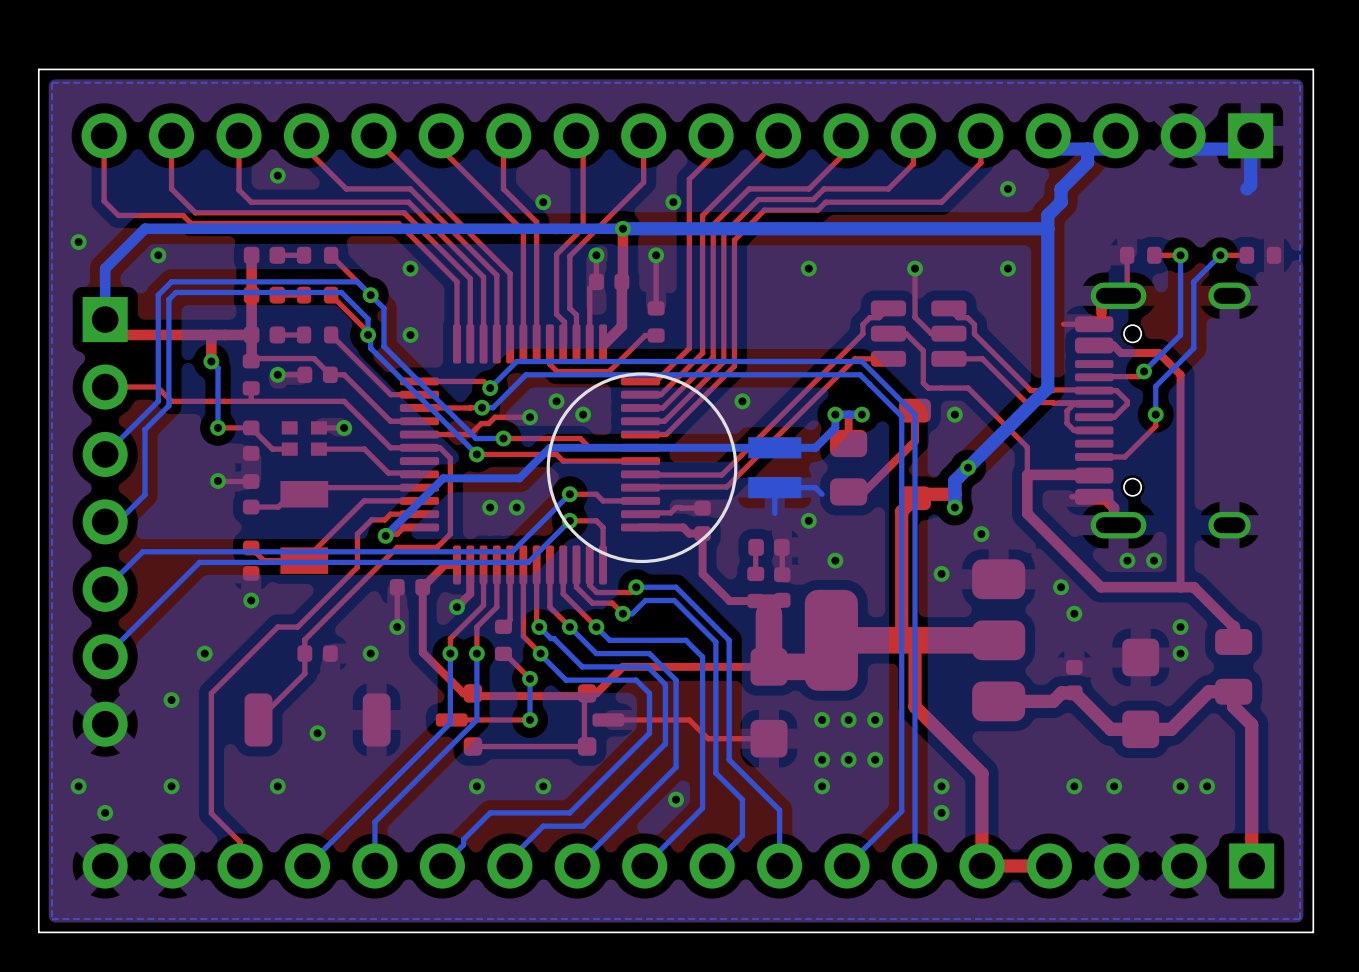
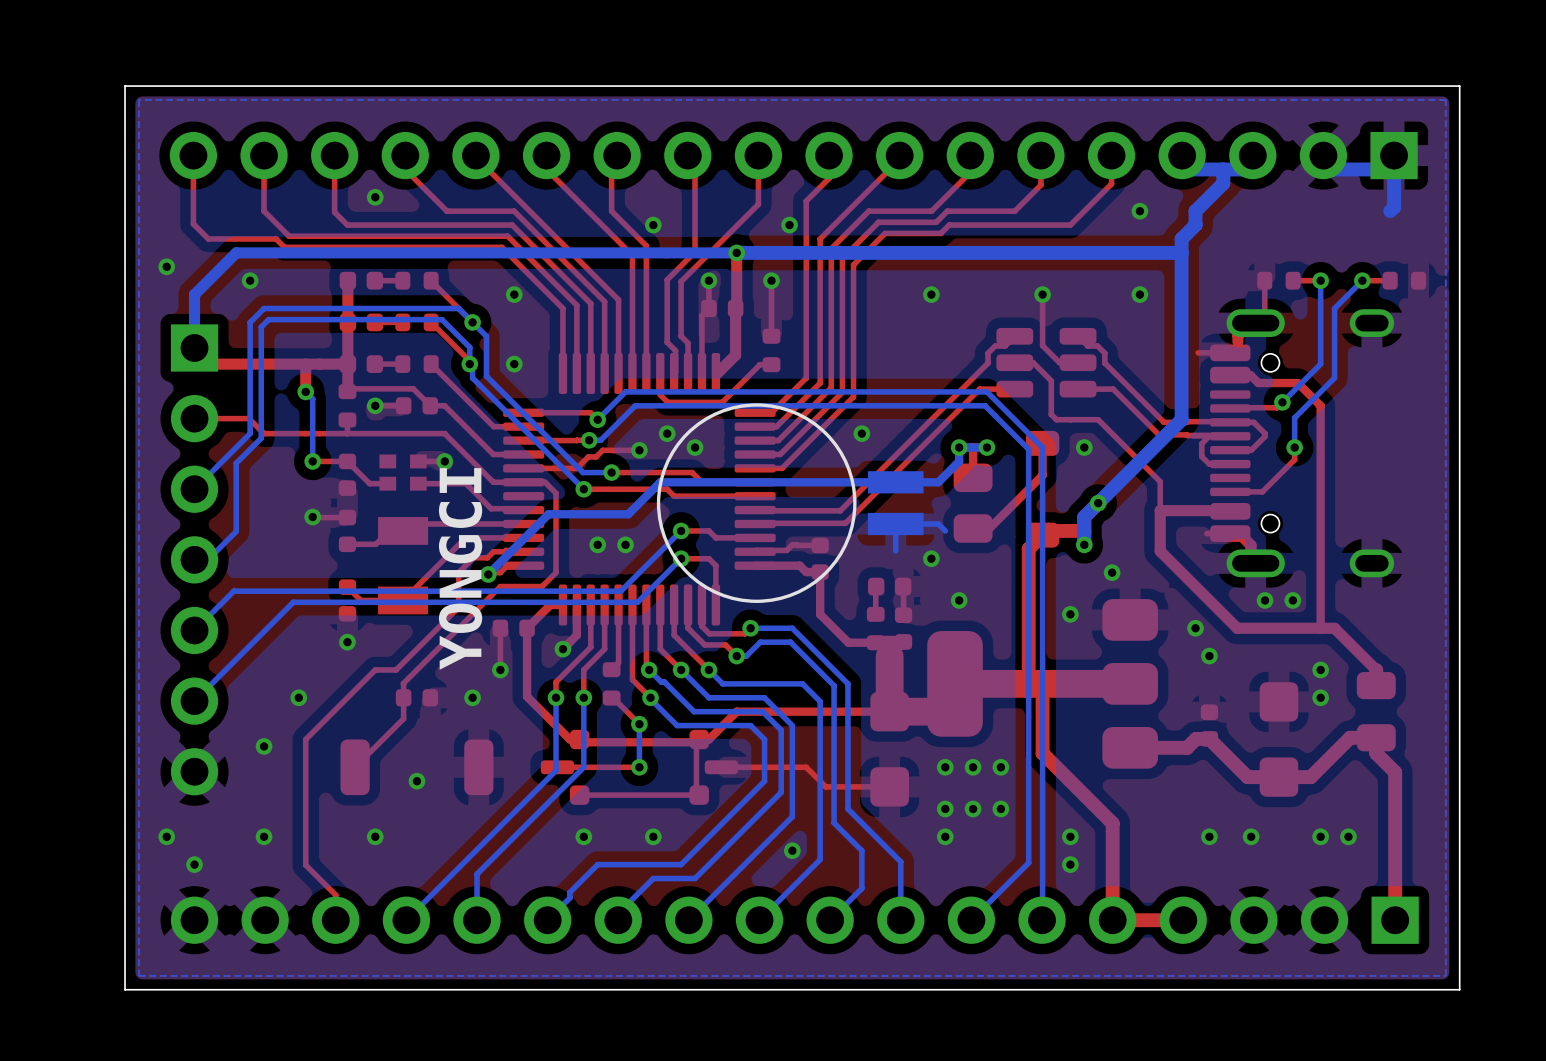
text: none -> YONGCI (460, 568)

